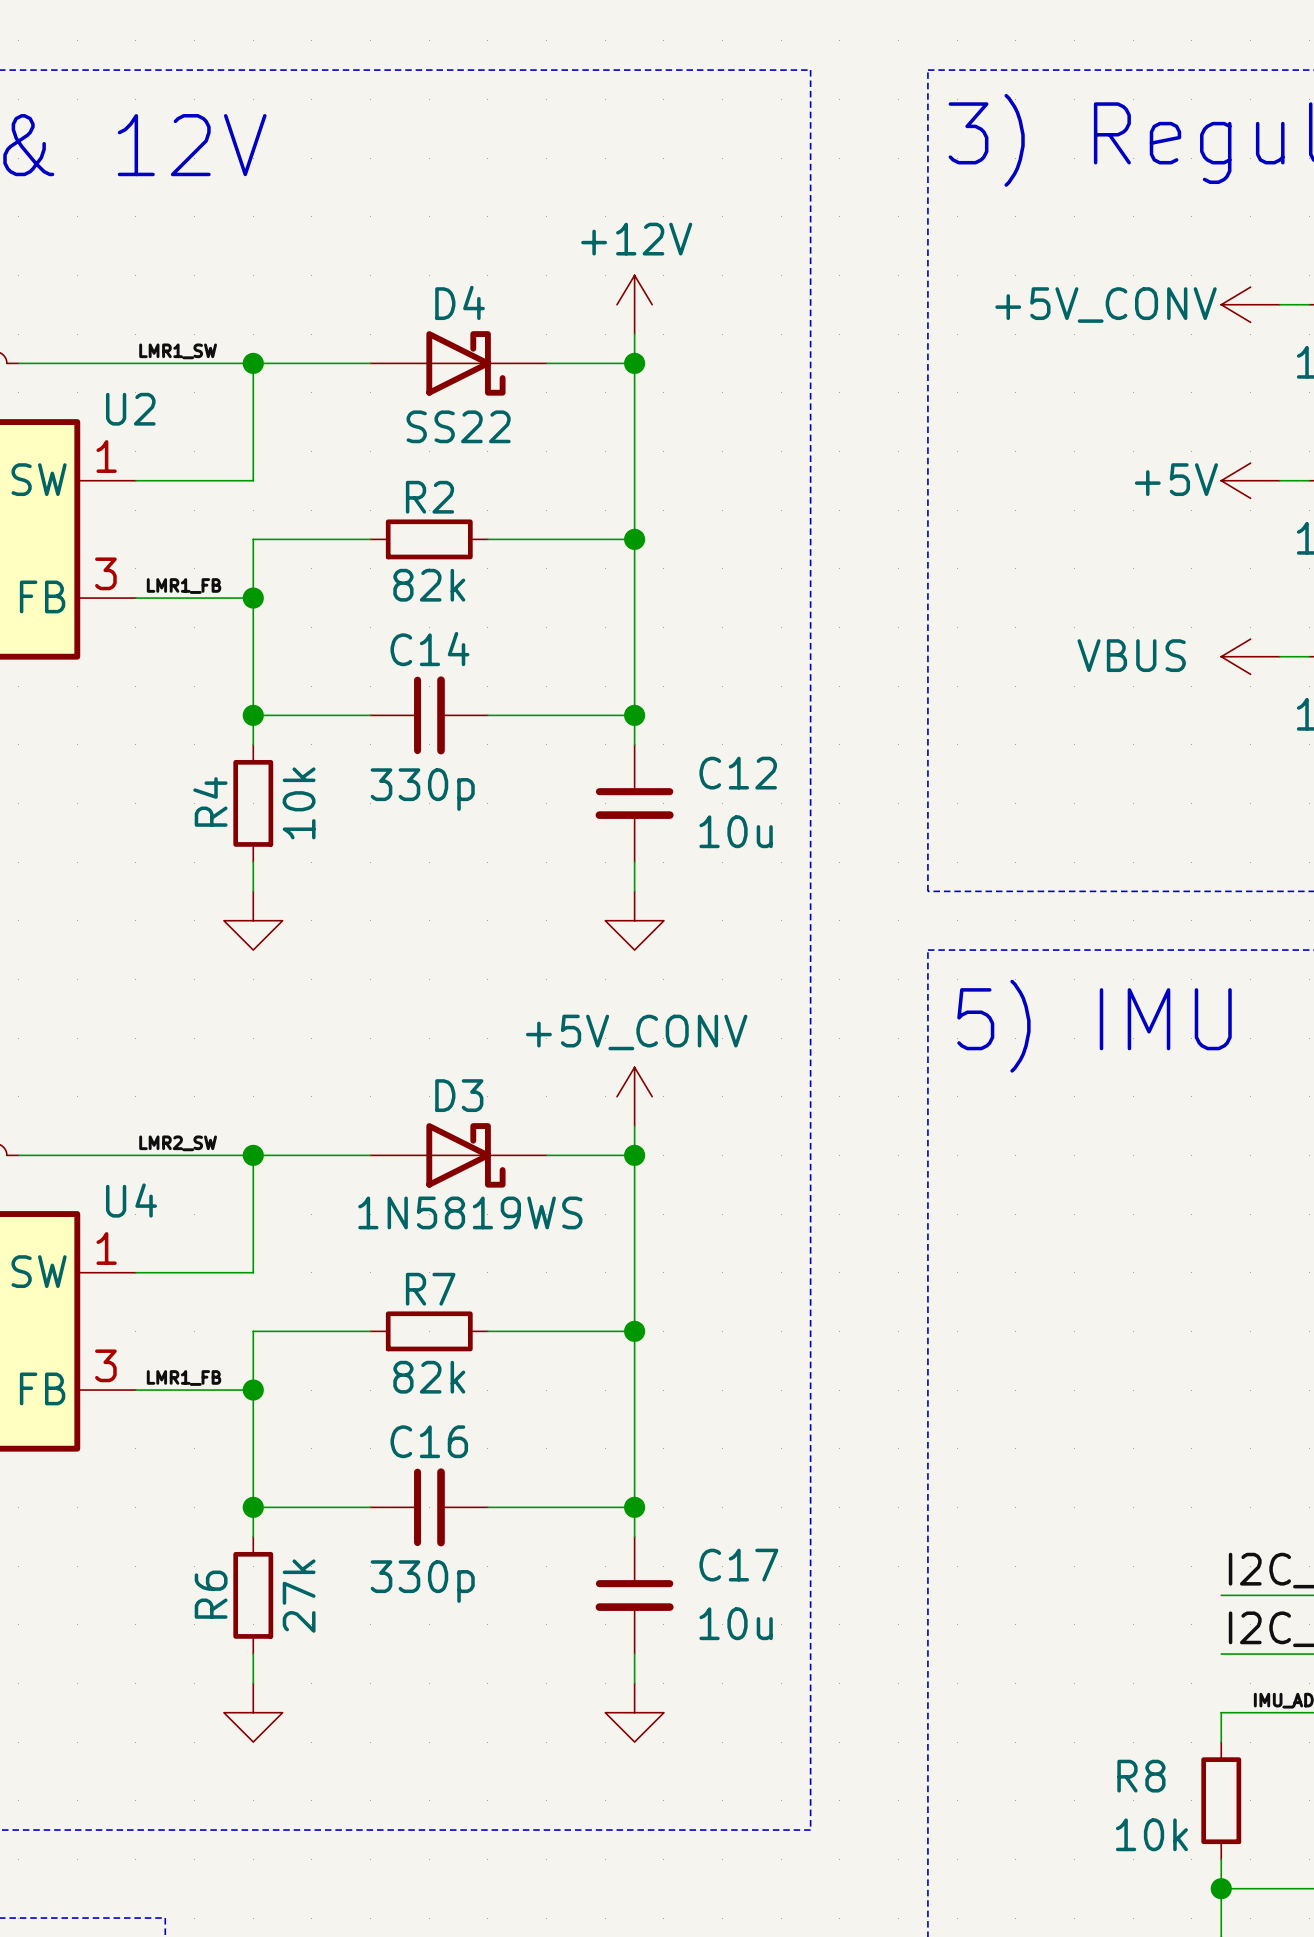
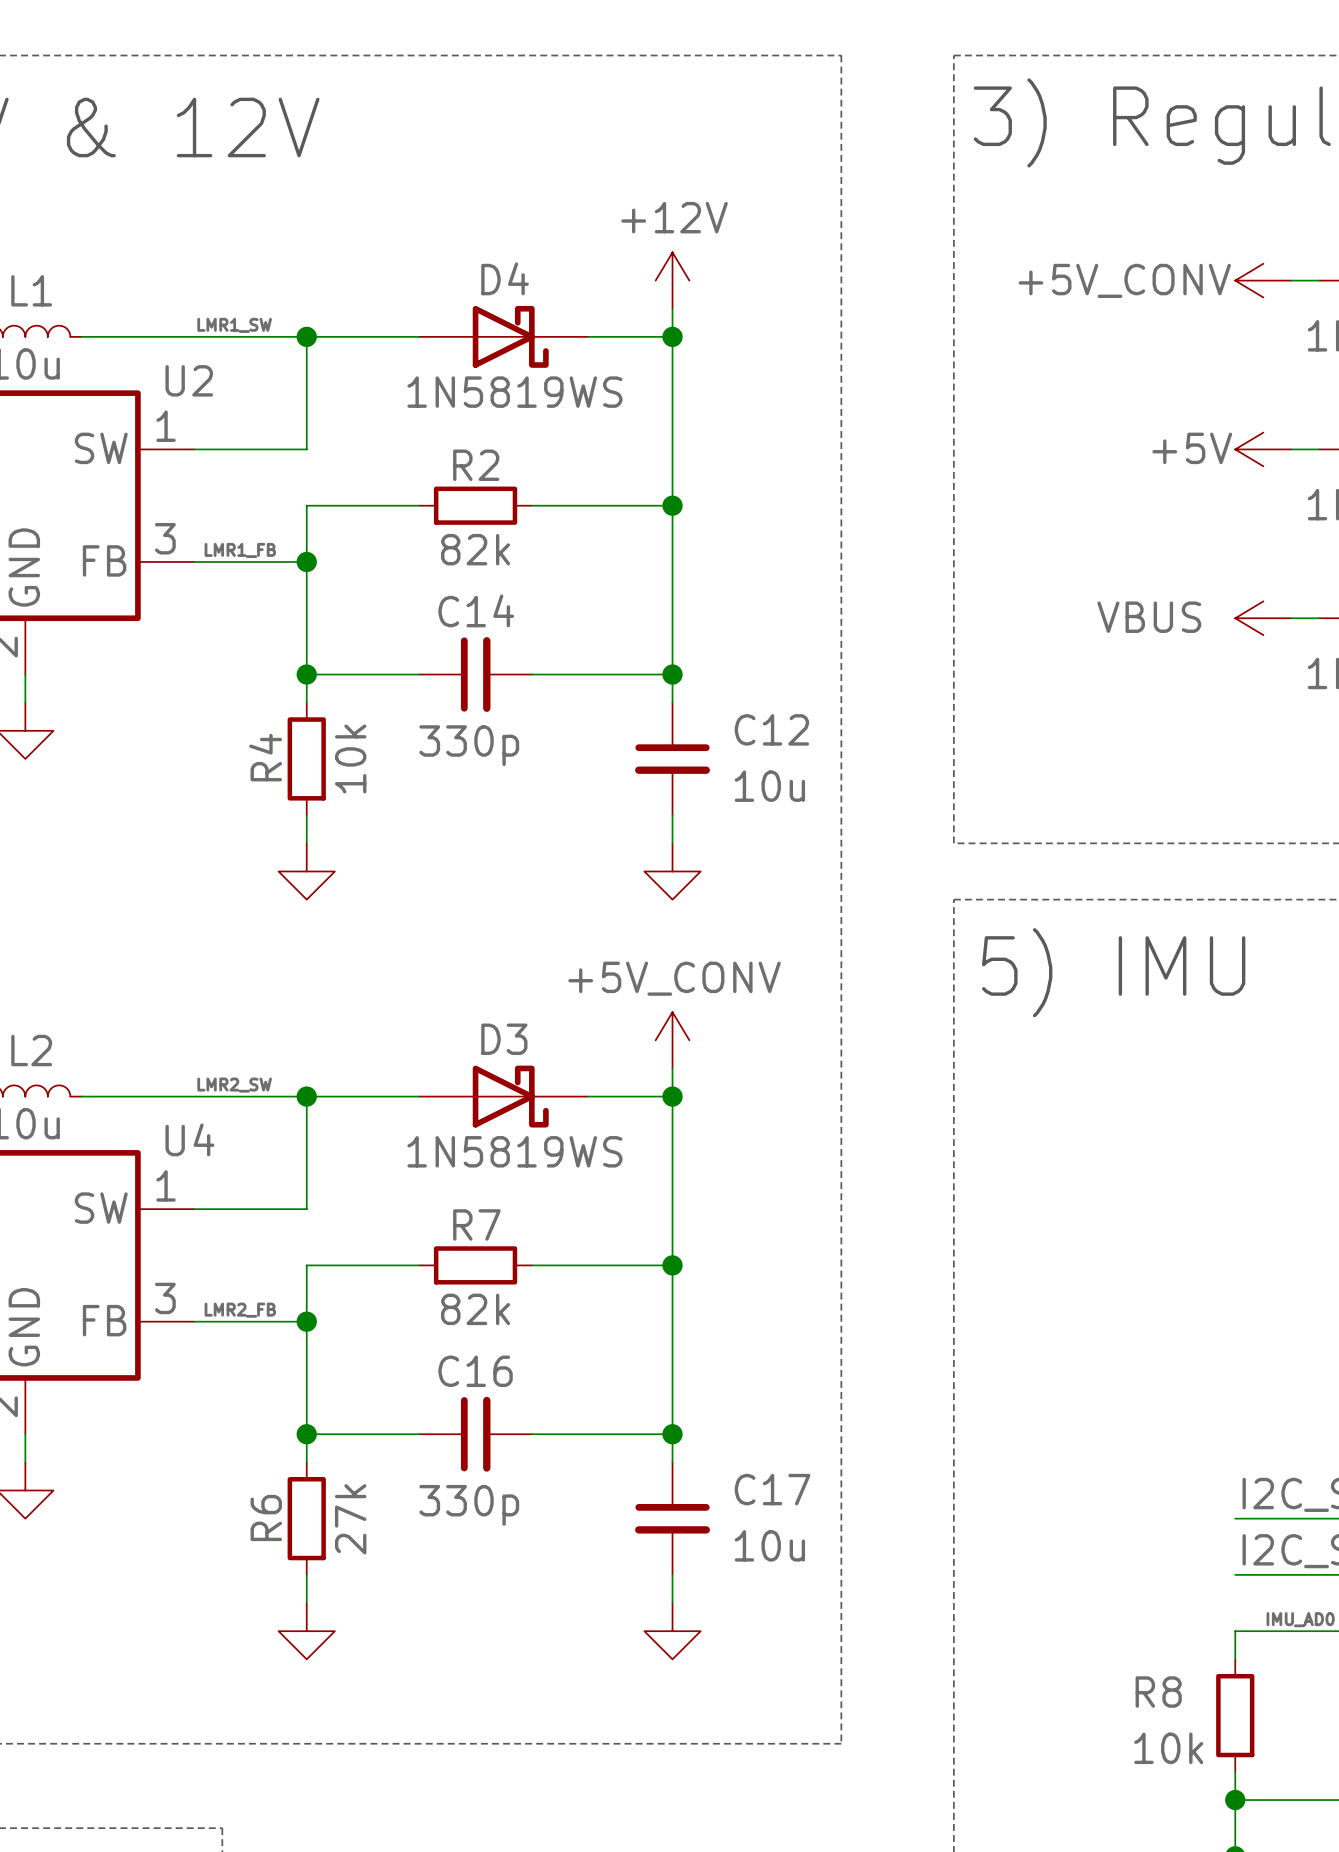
D4 value: SS22 (458, 426) -> 1N5819WS (514, 392)
label: LMR1_FB (184, 1378) -> LMR2_FB (240, 1310)

